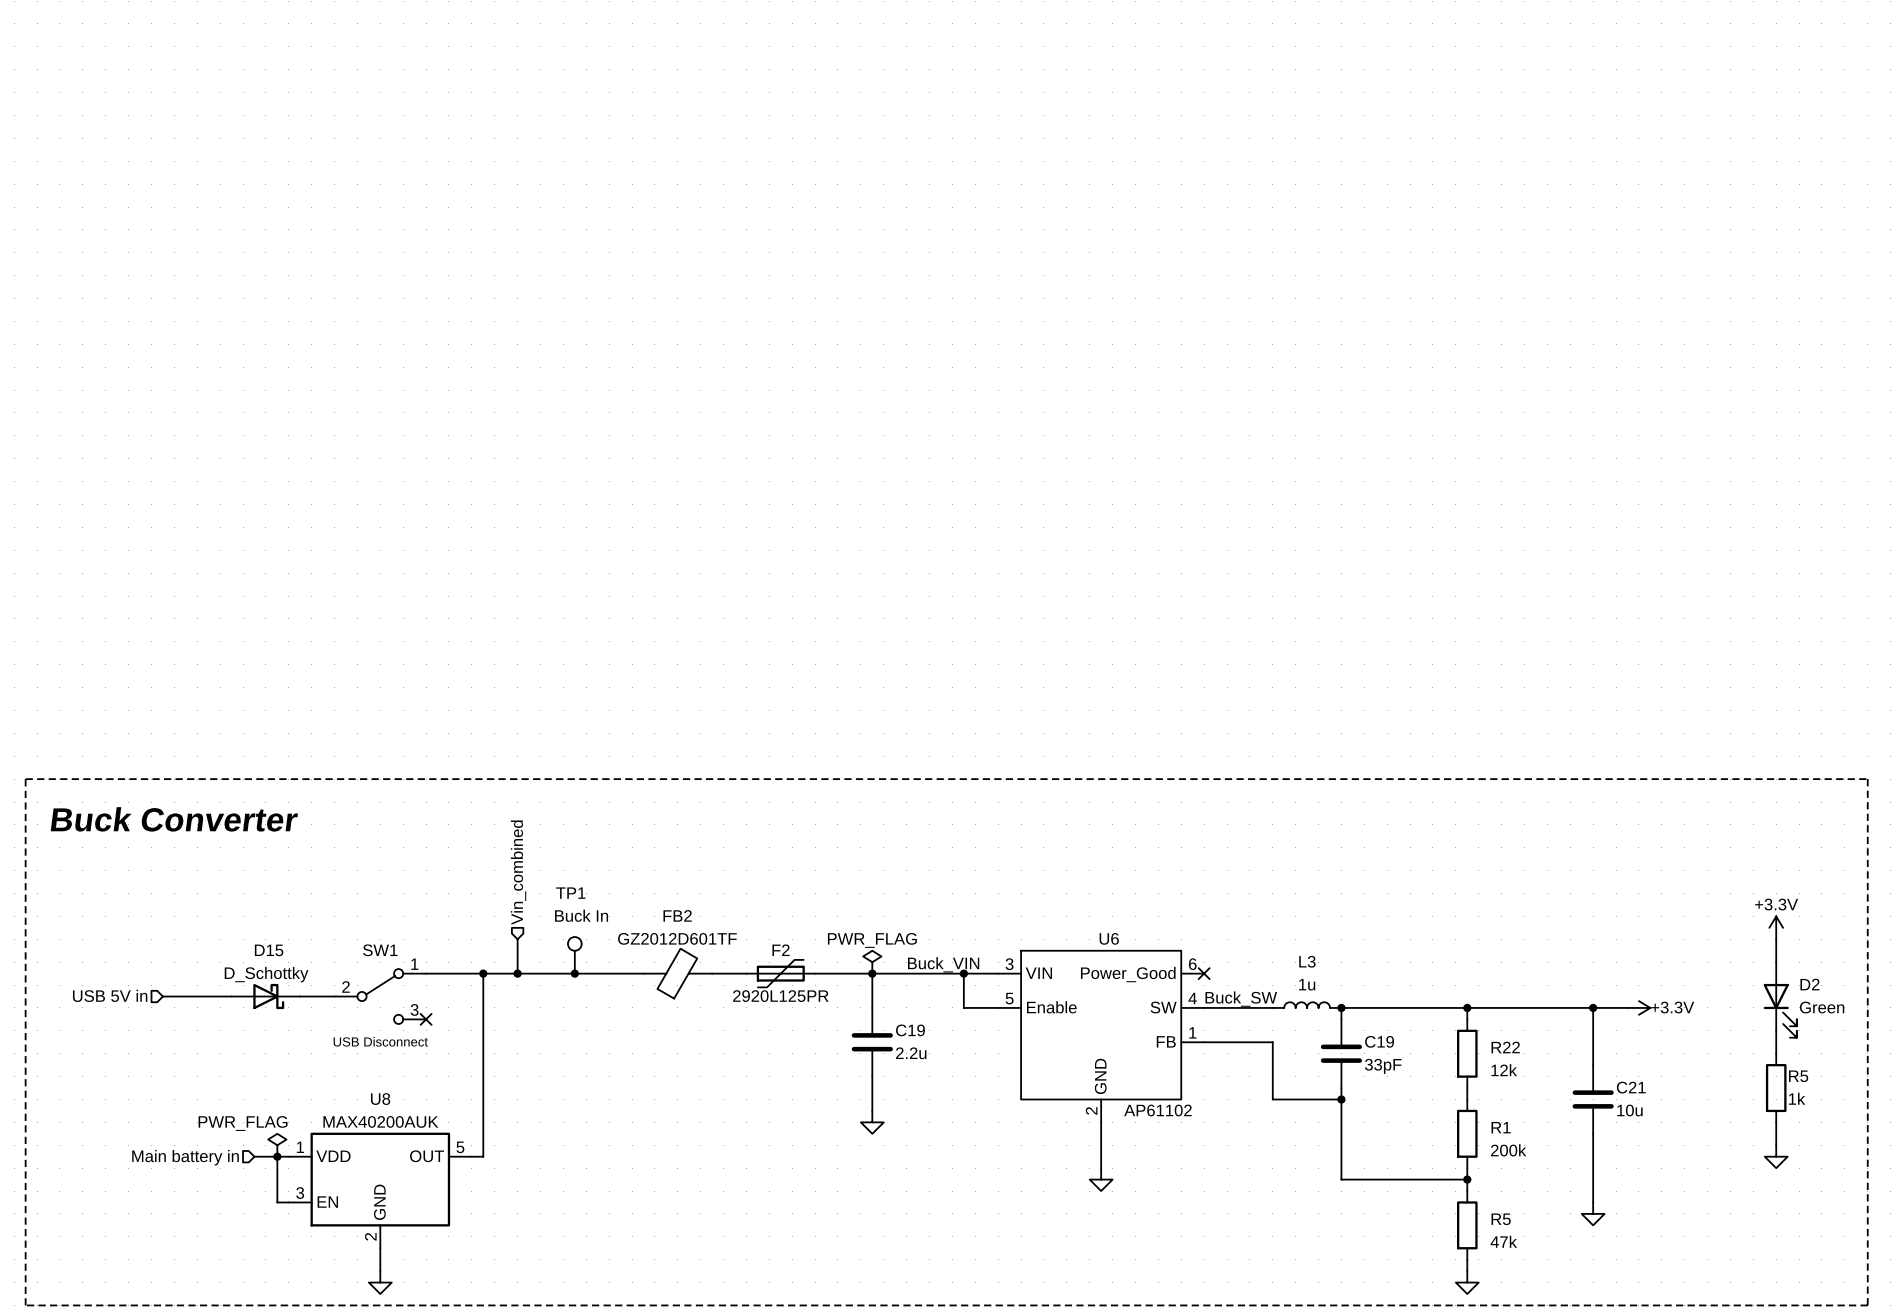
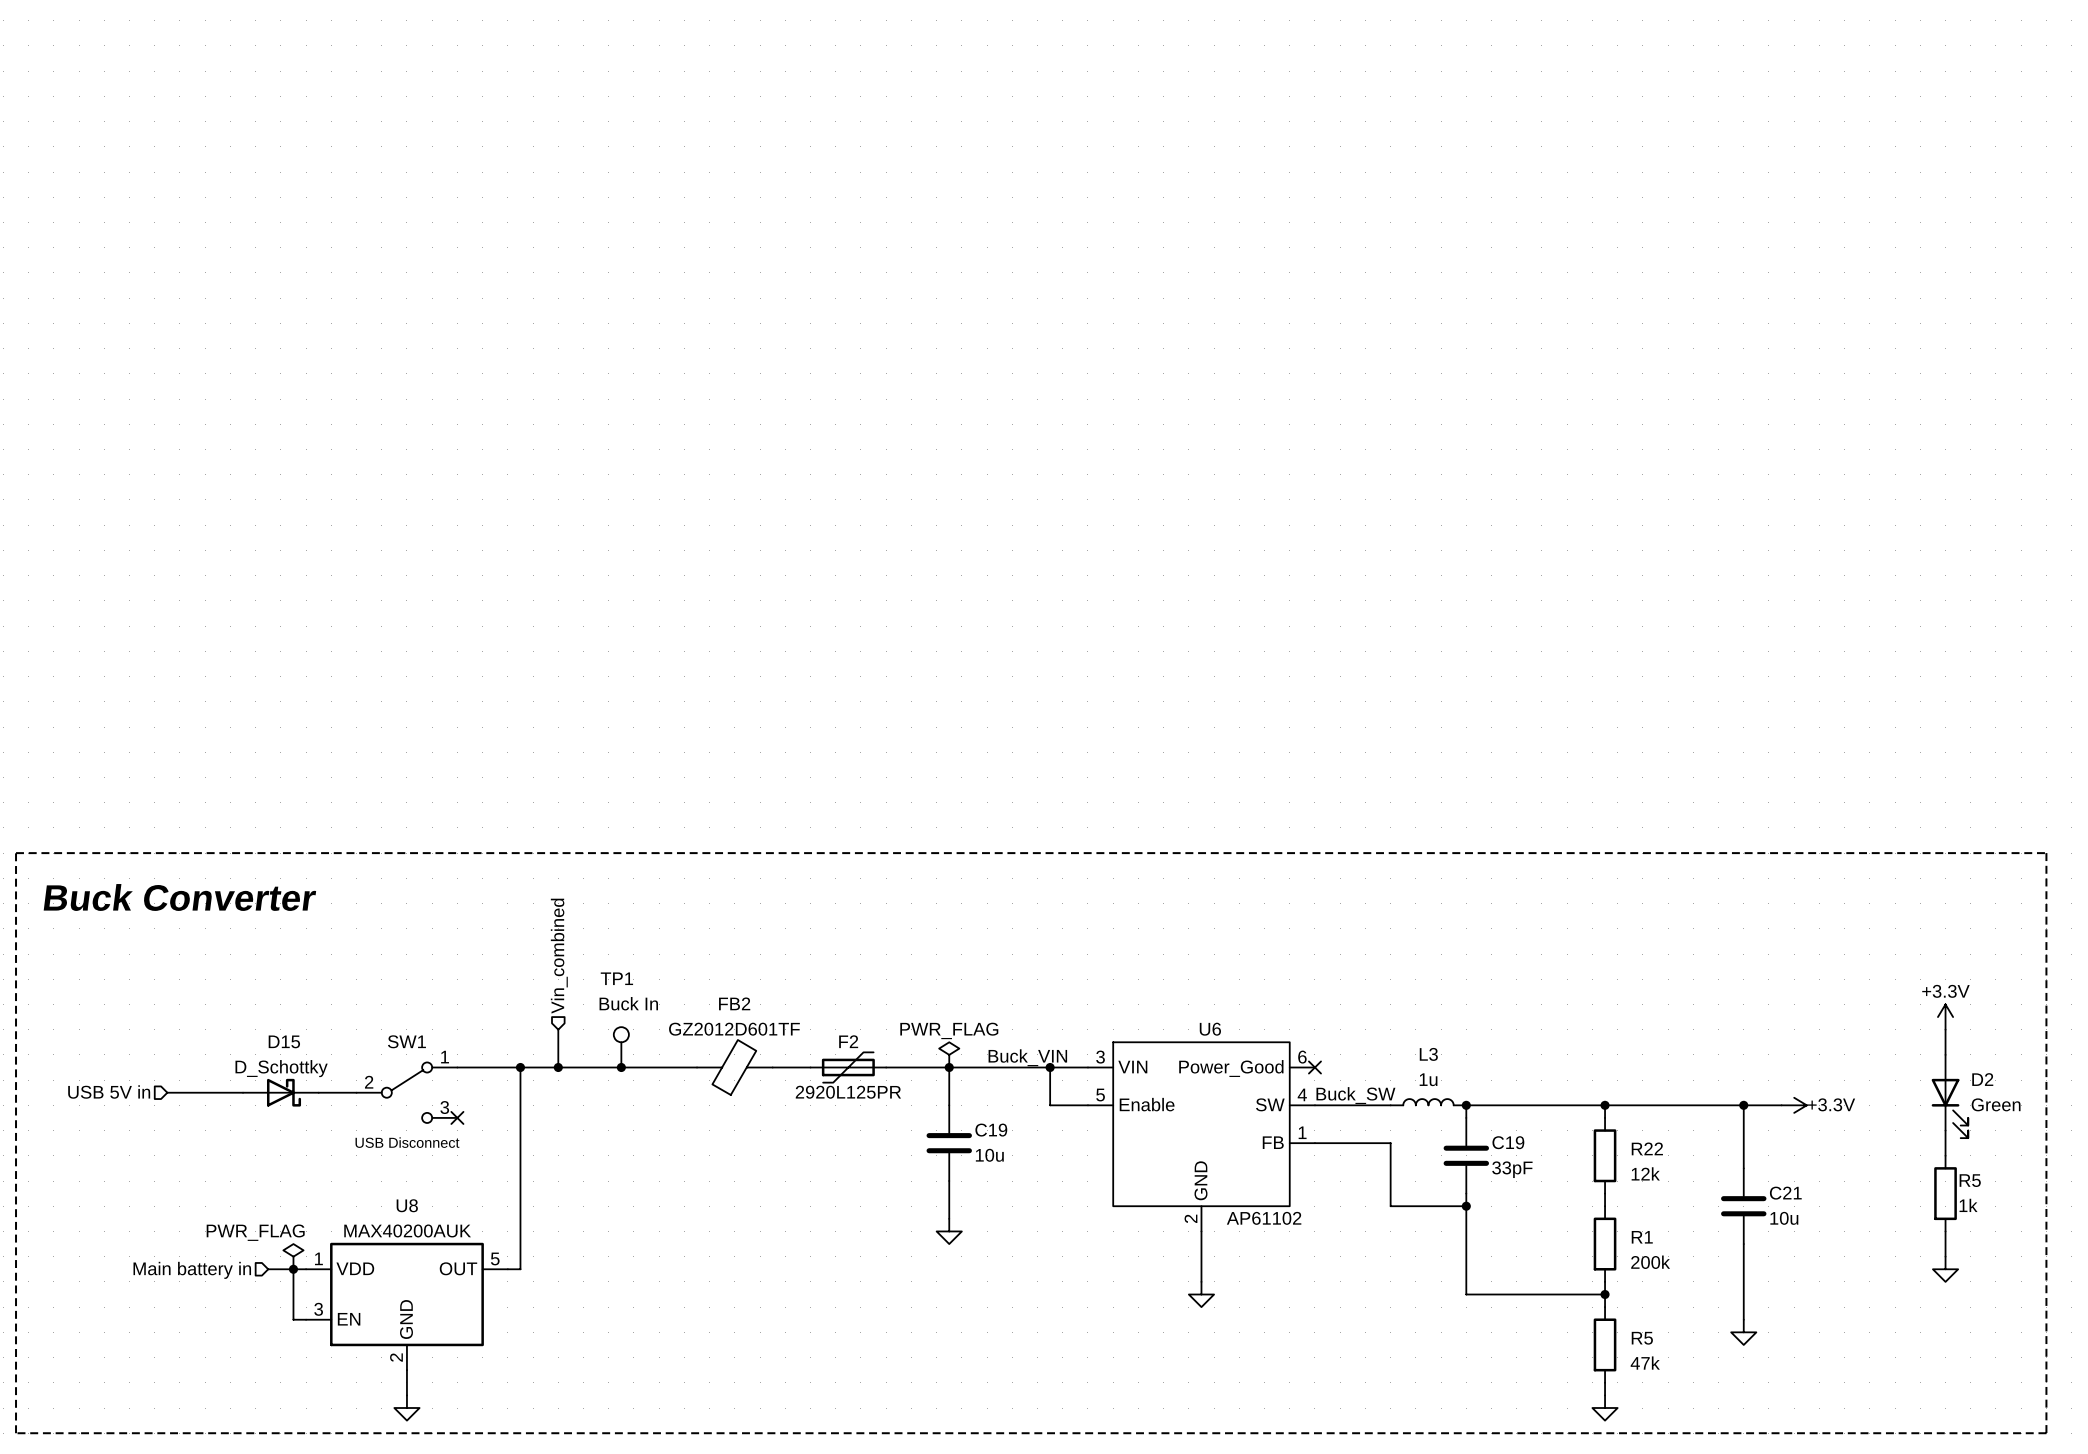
C19 value: 2.2u (911, 1053) -> 10u (989, 1155)

